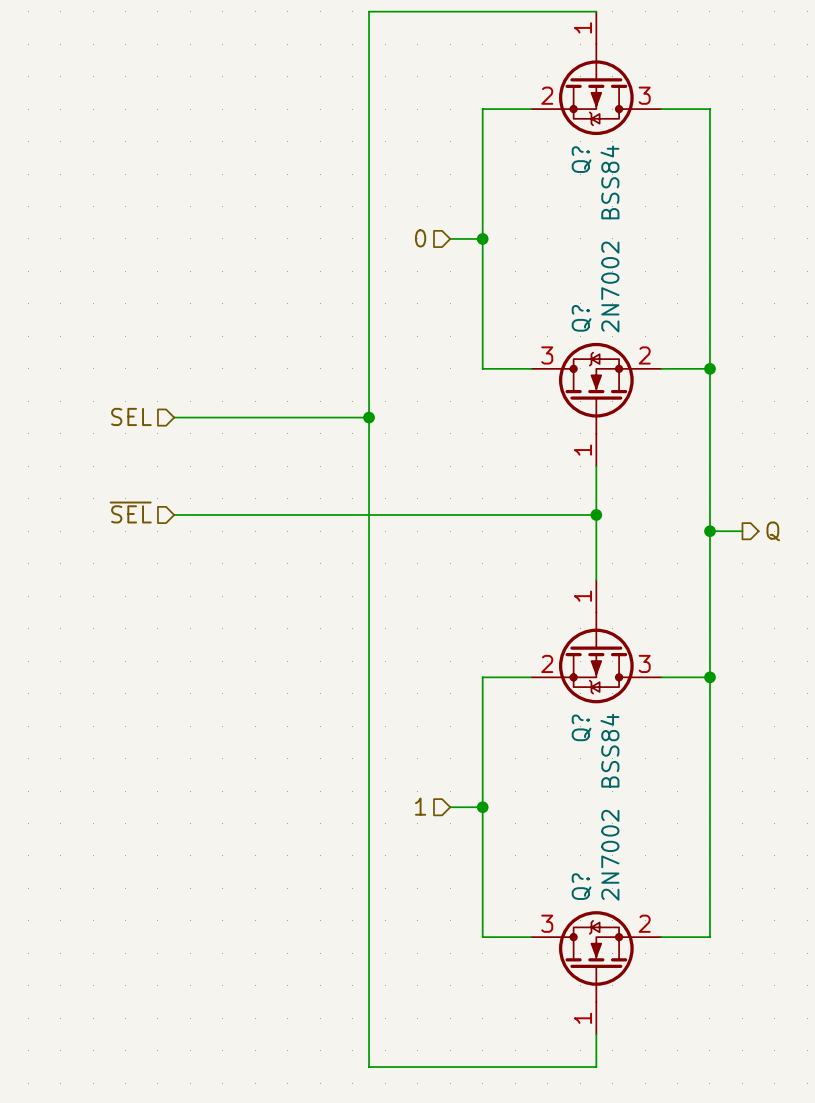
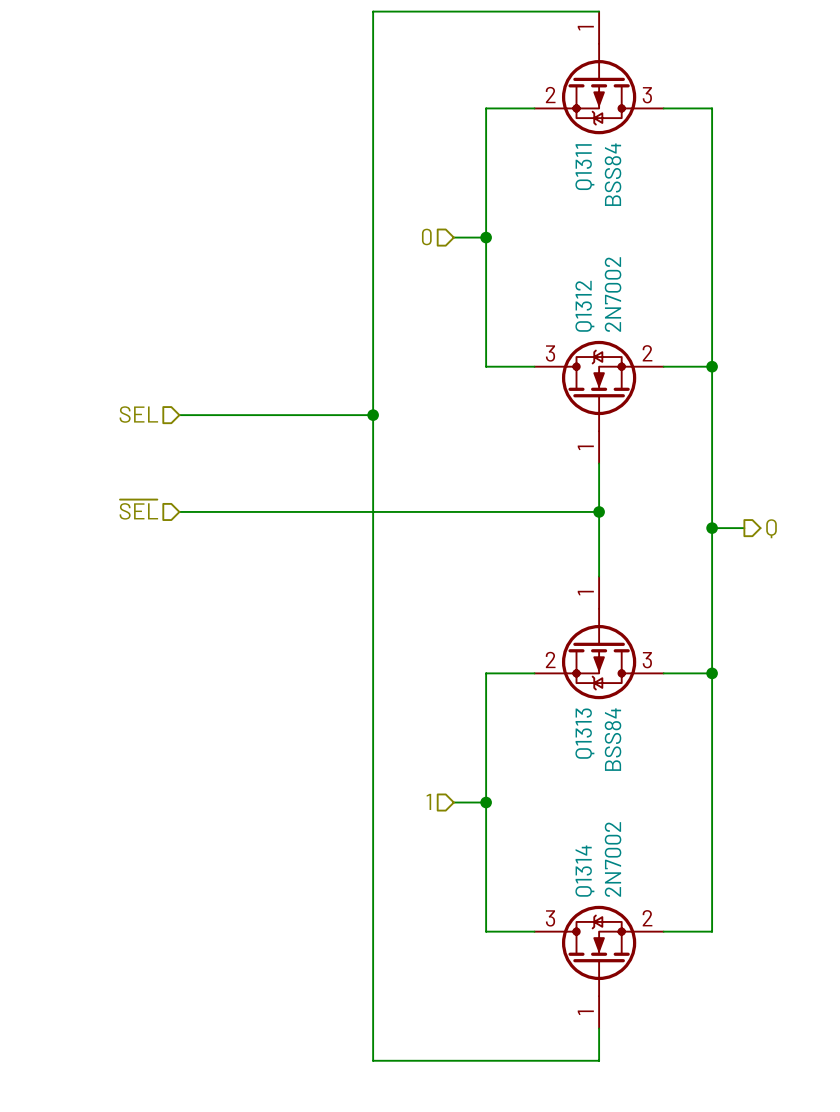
Q? name: Q? (581, 159) -> Q1311 (584, 167)
Q? name: Q? (581, 318) -> Q1312 (584, 306)
Q? name: Q? (581, 727) -> Q1313 (584, 733)
Q? name: Q? (581, 886) -> Q1314 (584, 871)

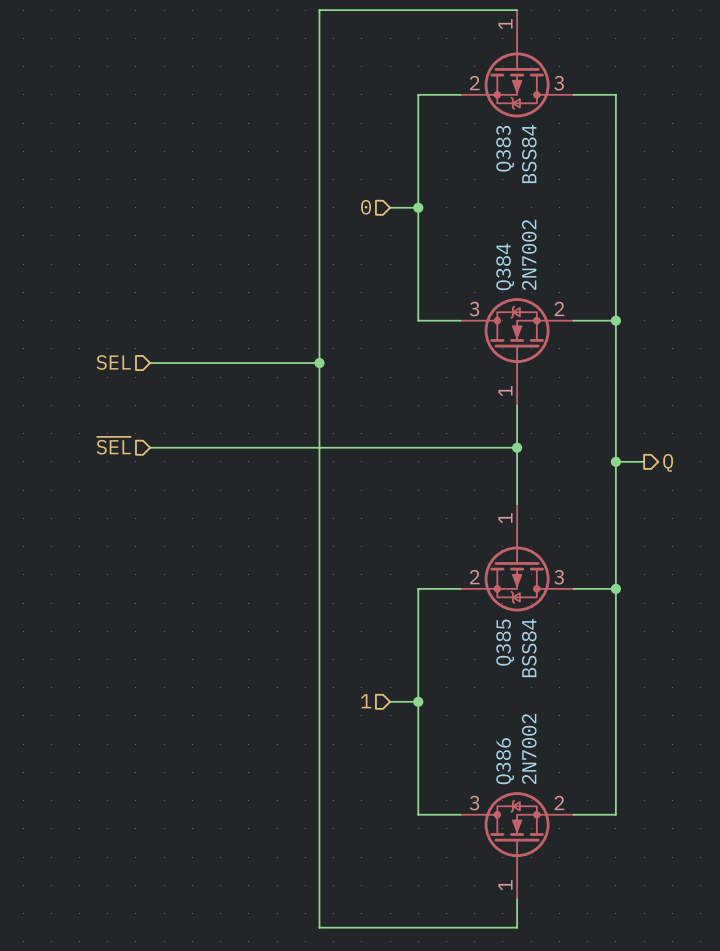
Q1311 name: Q1311 (584, 167) -> Q383 (505, 148)
Q1312 name: Q1312 (584, 306) -> Q384 (505, 266)
Q1313 name: Q1313 (584, 733) -> Q385 (505, 642)
Q1314 name: Q1314 (584, 871) -> Q386 (505, 761)

